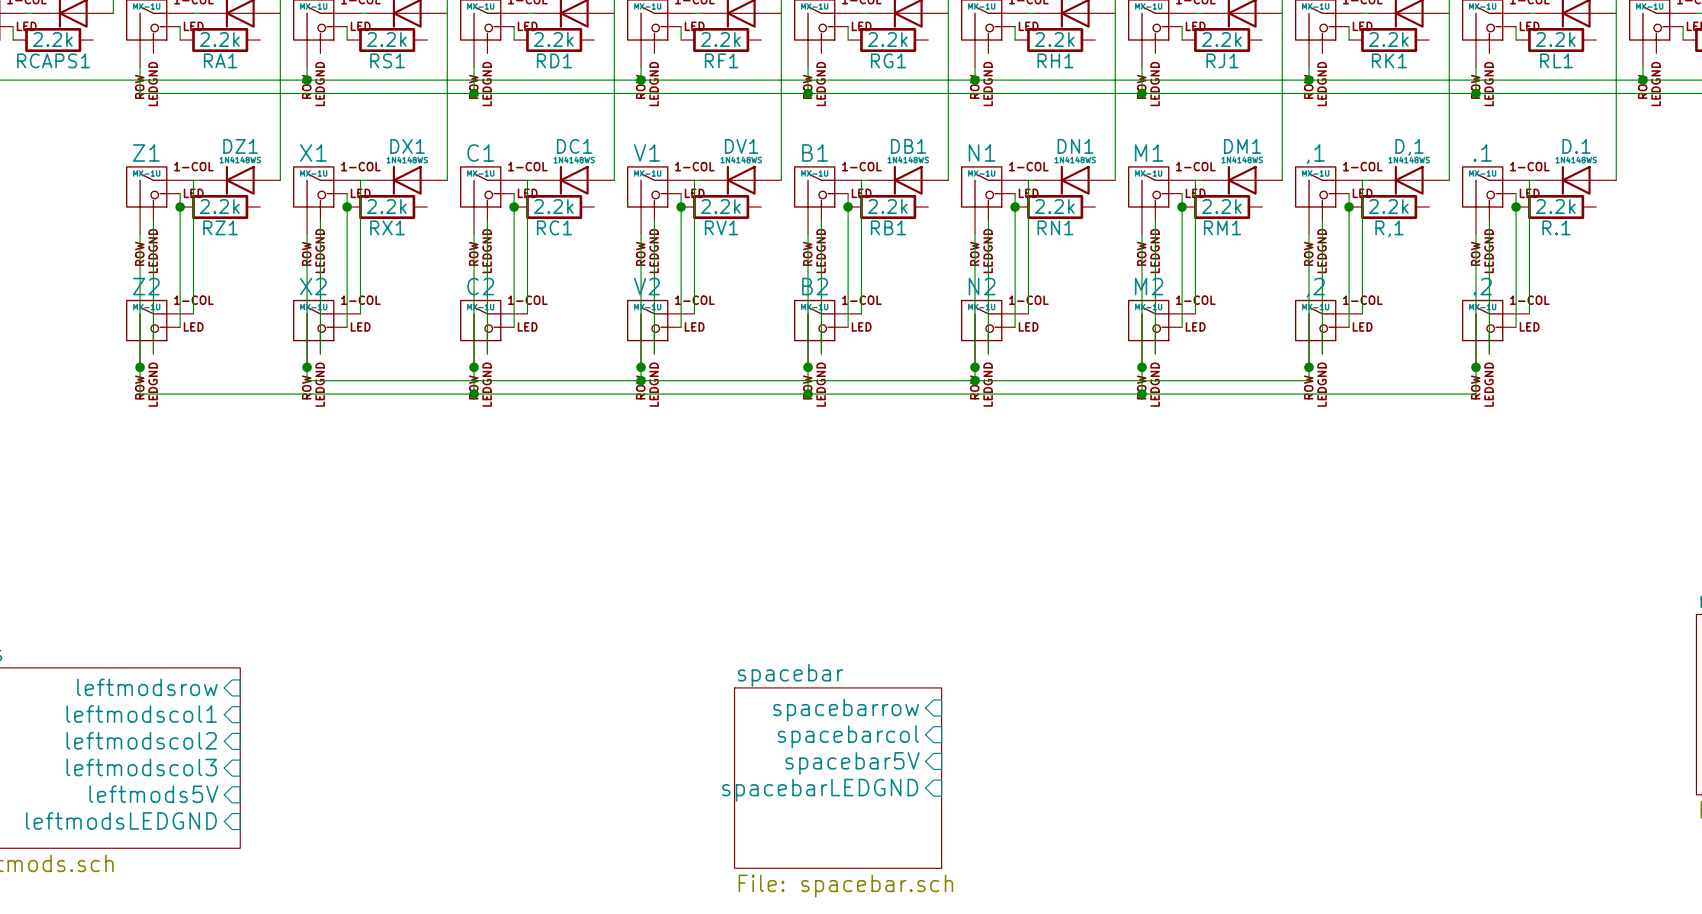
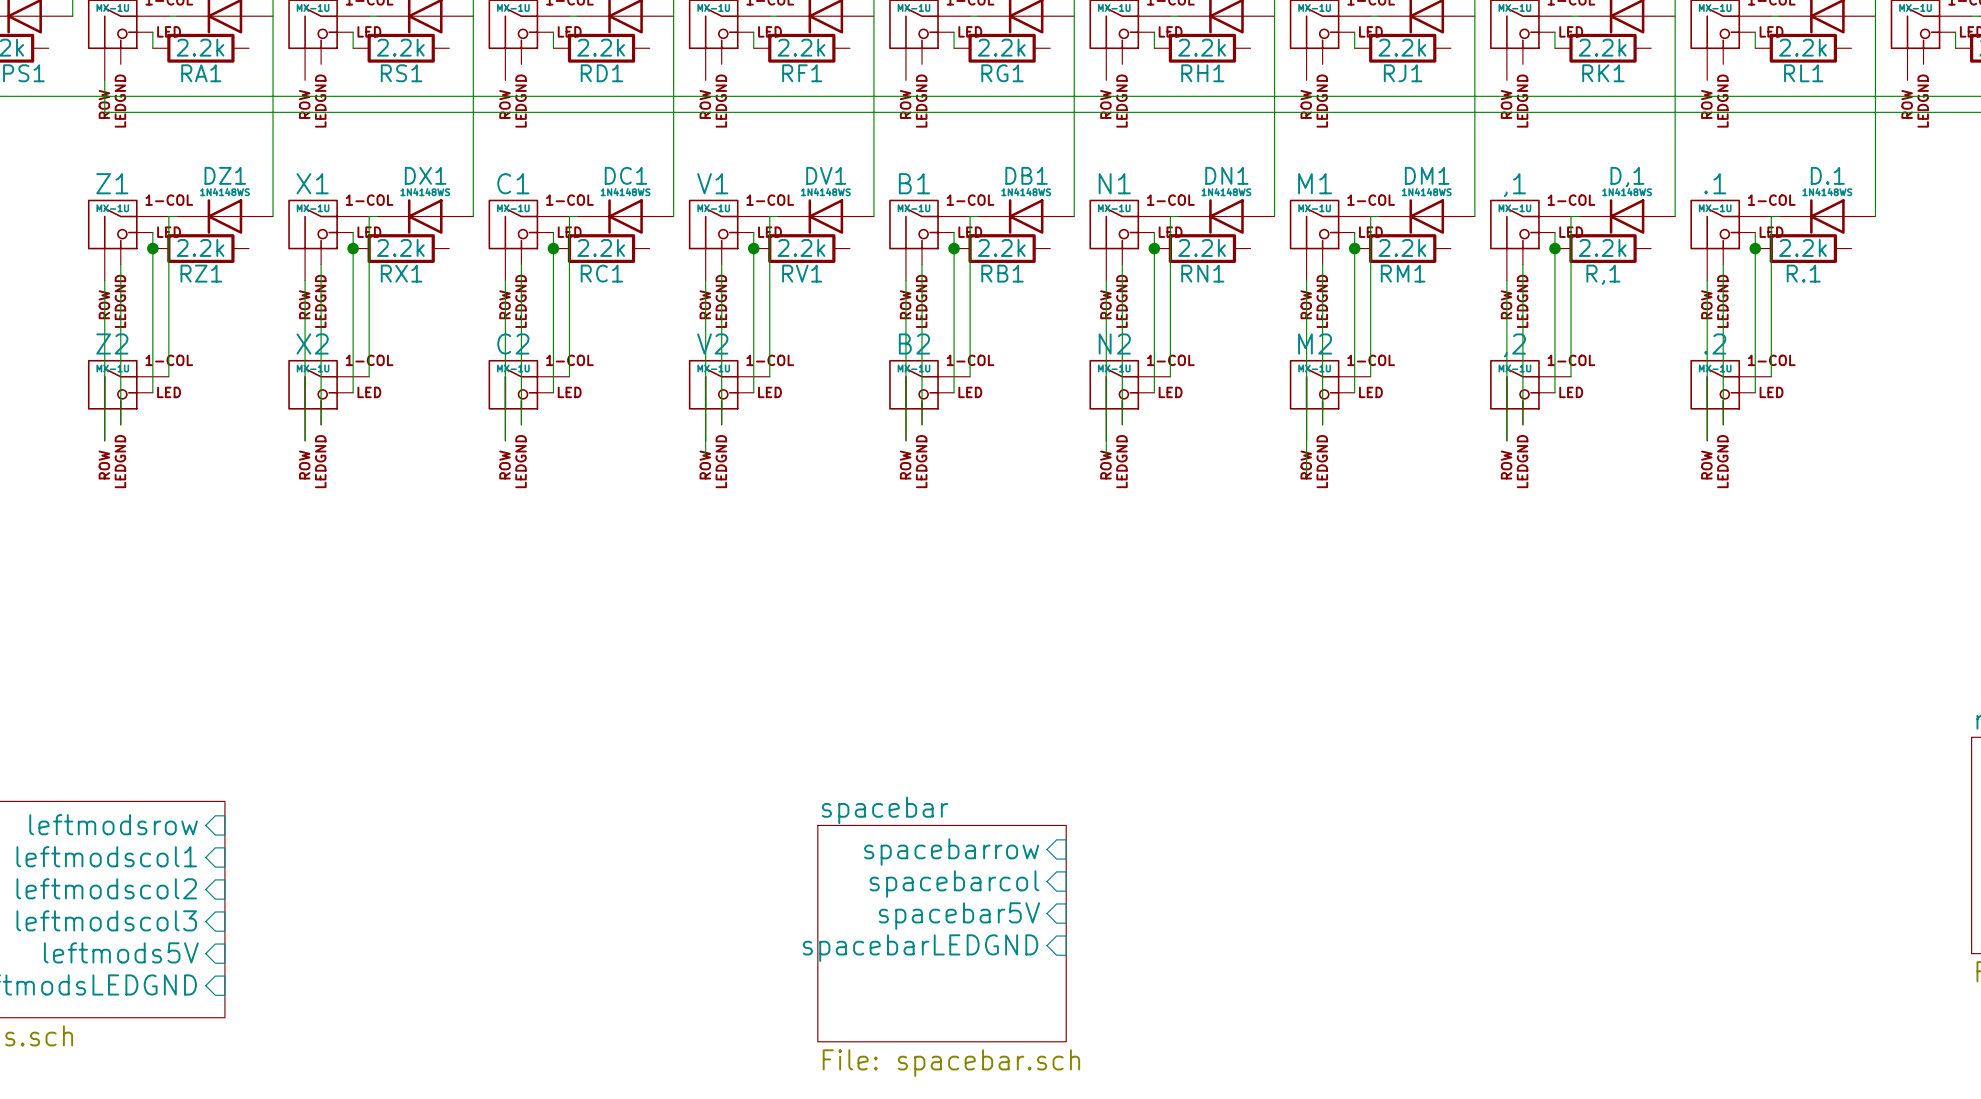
wire: (307, 66) (307, 80) -> none
wire: (474, 66) (474, 93) -> none
wire: (641, 66) (641, 80) -> none
wire: (808, 66) (808, 93) -> none
wire: (975, 66) (975, 80) -> none
wire: (1142, 66) (1142, 93) -> none
wire: (1309, 66) (1309, 80) -> none
wire: (1476, 66) (1476, 93) -> none
wire: (1642, 66) (1642, 80) -> none
junction: (307, 80) -> none
junction: (641, 80) -> none
junction: (975, 80) -> none
junction: (1309, 80) -> none
junction: (1642, 80) -> none
junction: (474, 93) -> none
junction: (808, 93) -> none
junction: (1142, 93) -> none
junction: (1476, 93) -> none
wire: (140, 367) (140, 394) (1476, 394) (1476, 367) -> none
junction: (140, 367) -> none
wire: (307, 367) (307, 380) (1309, 380) (1309, 367) -> none
junction: (307, 367) -> none
wire: (474, 367) (474, 394) -> none
junction: (474, 367) -> none
junction: (641, 367) -> none
wire: (808, 367) (808, 394) -> none
junction: (808, 367) -> none
junction: (975, 367) -> none
junction: (1142, 367) -> none
junction: (1309, 367) -> none
junction: (1476, 367) -> none
junction: (641, 380) -> none
junction: (975, 380) -> none
junction: (474, 394) -> none
junction: (808, 394) -> none
junction: (1142, 394) -> none

